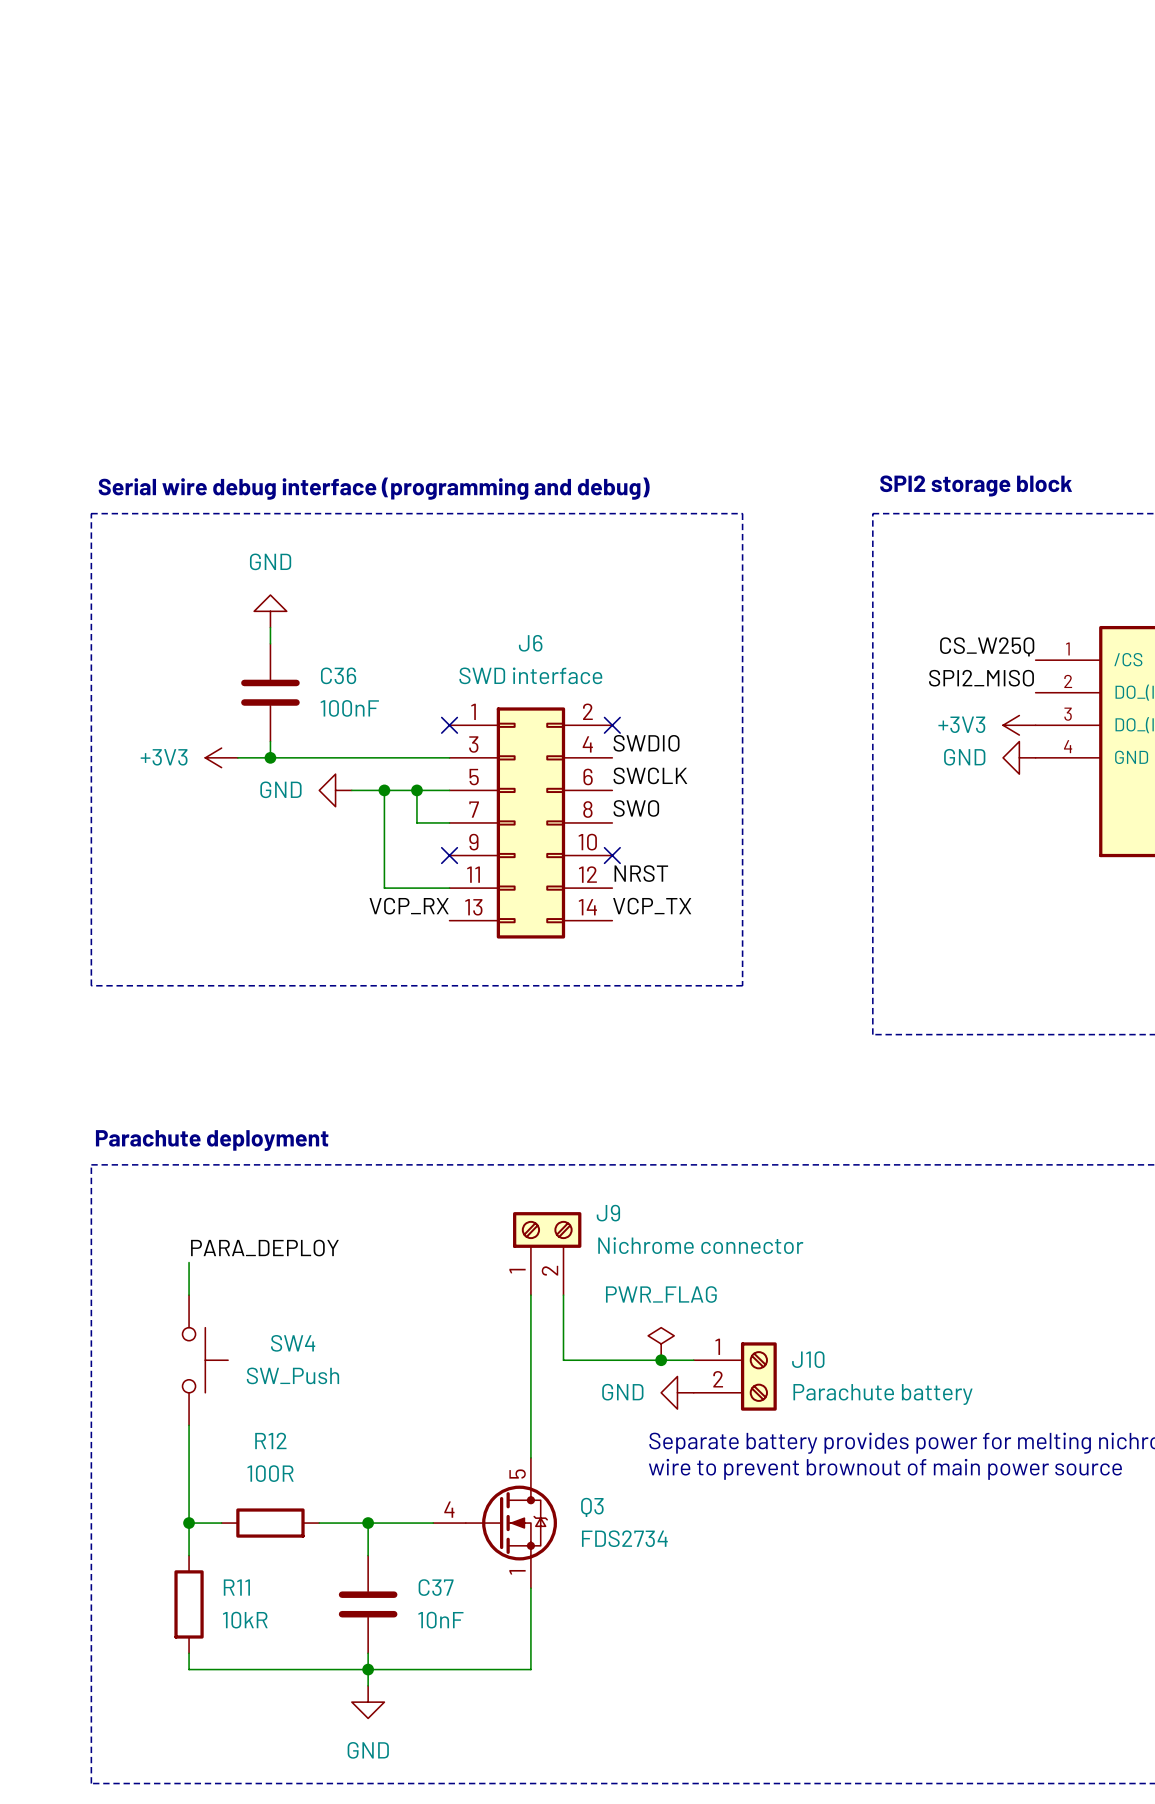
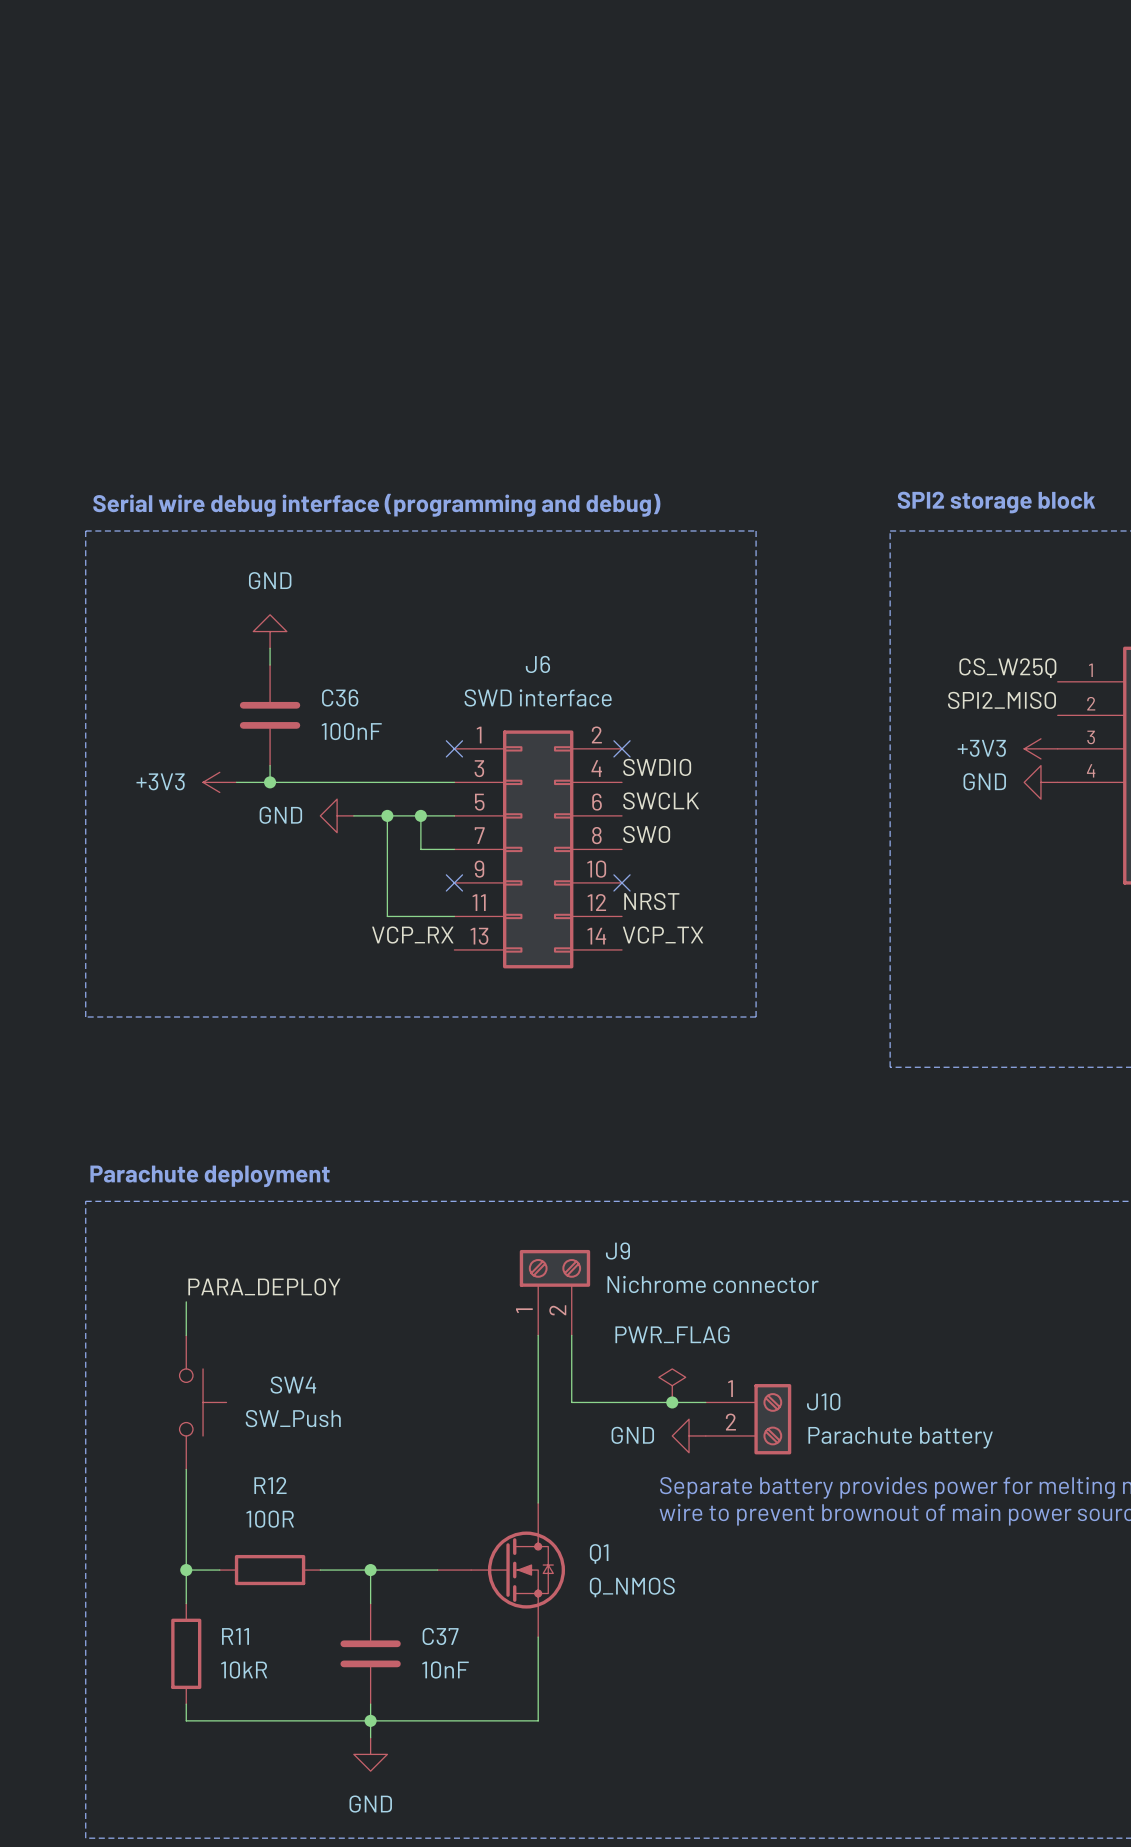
Q3: FDS2734 (495, 1523) -> none
Q1: none -> Q_NMOS (501, 1570)

